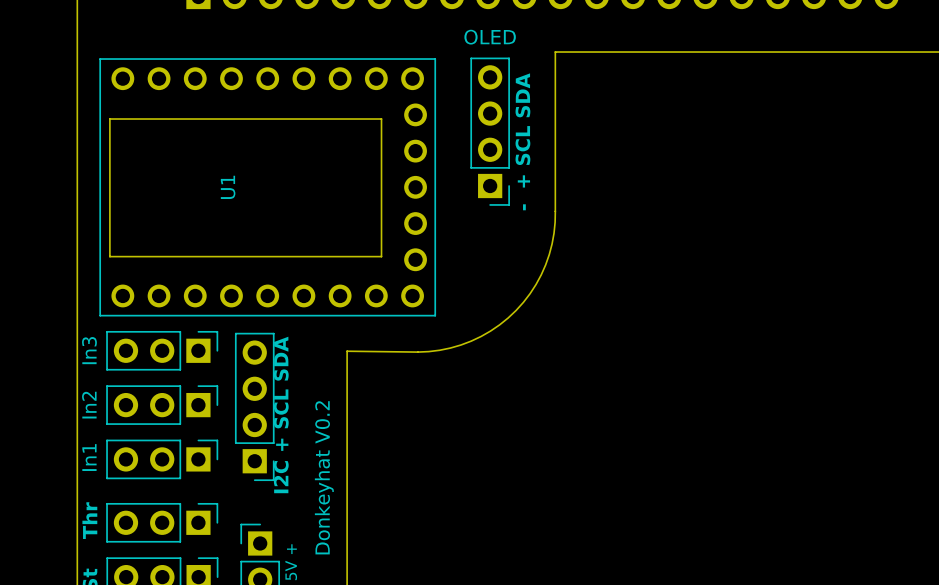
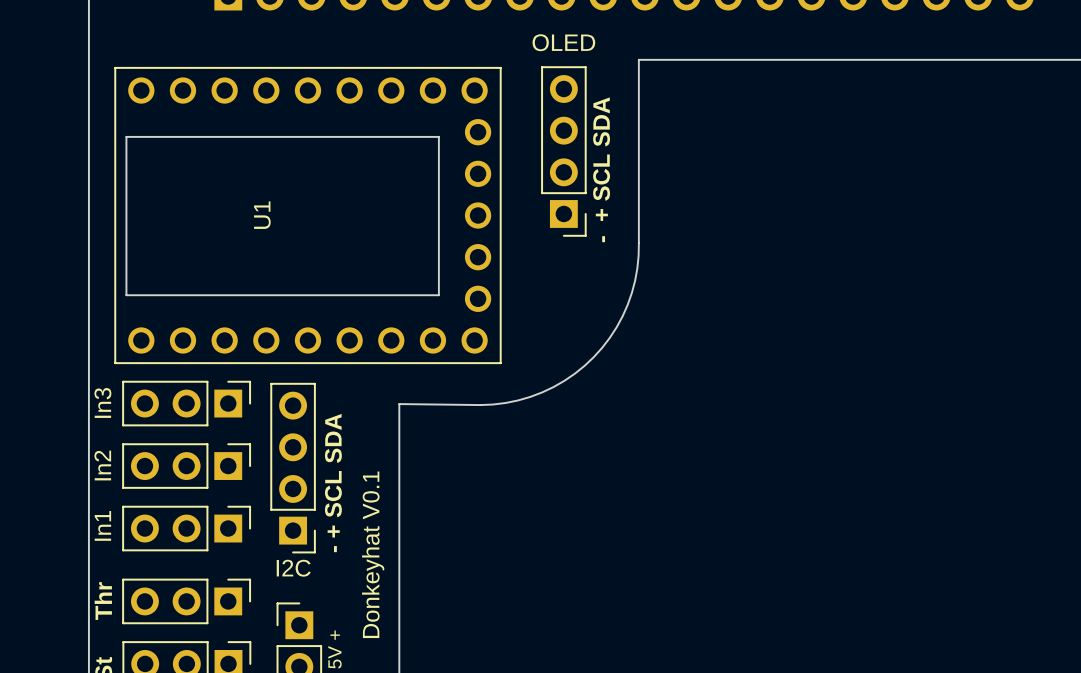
text: I2C + SCL SDA (281, 414) -> - + SCL SDA (333, 483)
text: Donkeyhat V0.2 (324, 477) -> Donkeyhat V0.1 (373, 554)
I2C name: none -> I2C (293, 568)

